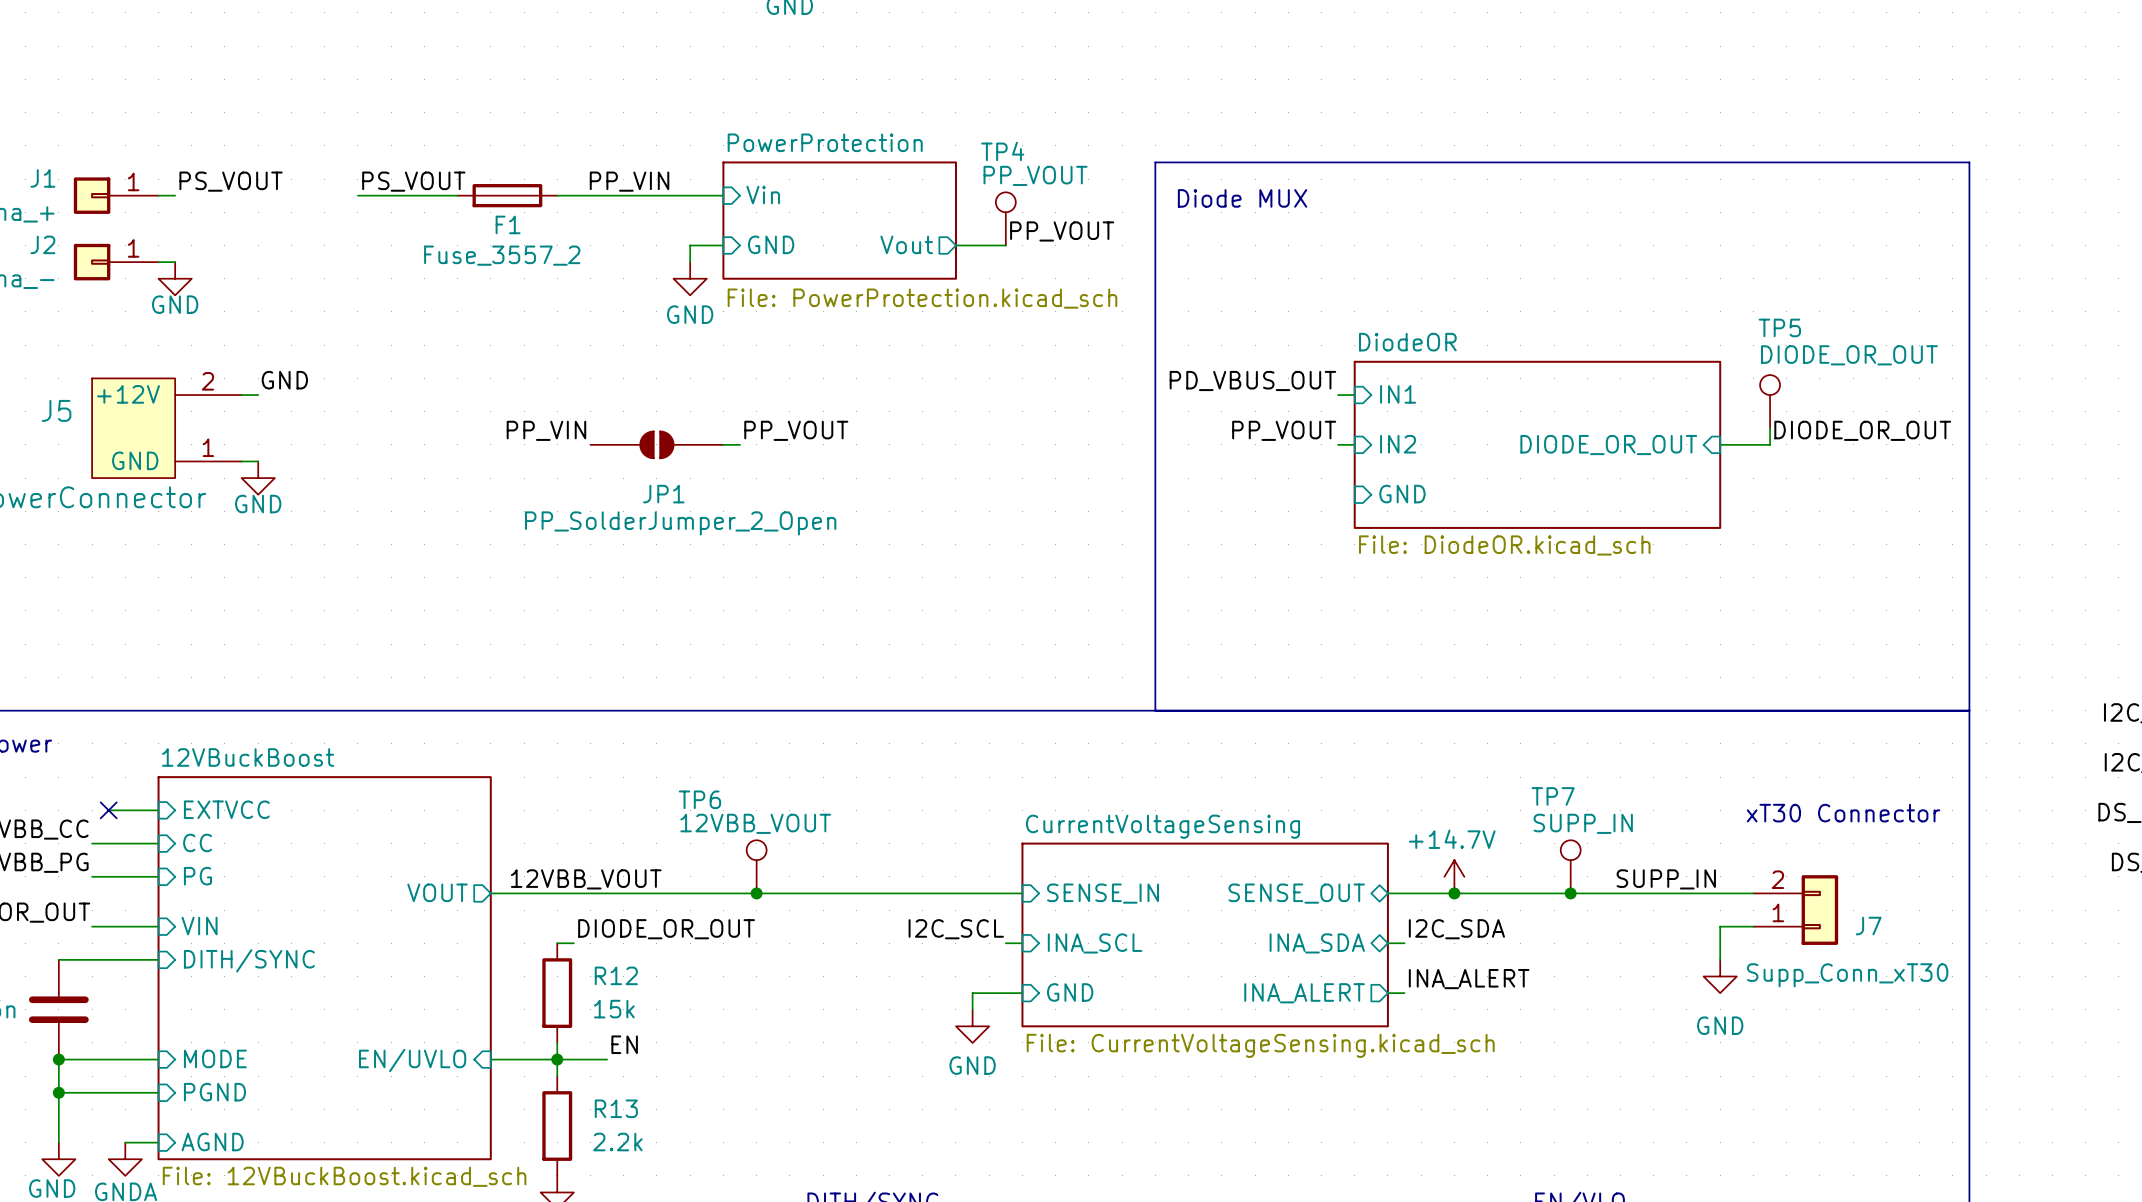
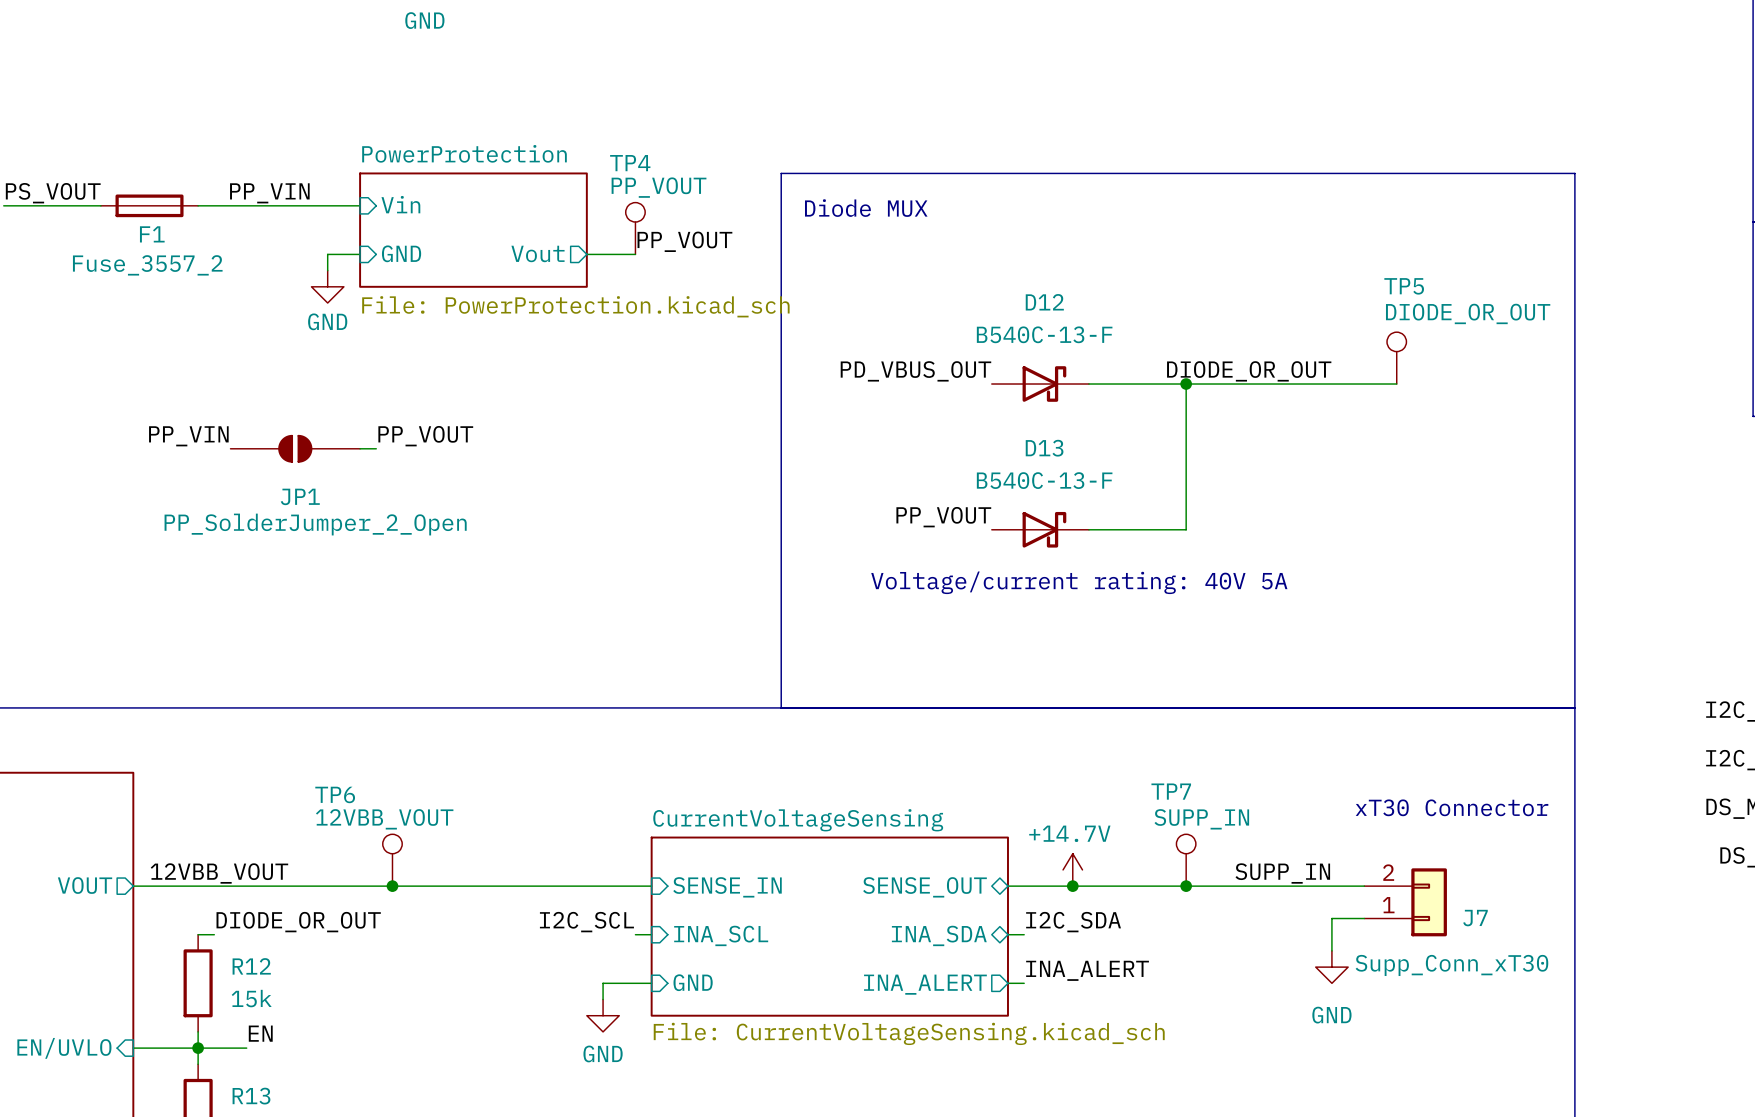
D12: none -> B540C-13-F (1040, 384)
wire: none -> (1088, 384) (1396, 384)
wire: none -> (1186, 384) (1186, 529) (1088, 529)
junction: none -> (1186, 384)
label position: PD_VBUS_OUT (1252, 380) -> PD_VBUS_OUT (915, 371)
sheet pin: IN1 (1398, 394) -> none
wire: (1338, 395) (1354, 395) -> none
TP5 position: (1770, 401) -> (1396, 358)
wire: (1770, 428) (1770, 444) (1720, 444) -> none
label position: PP_VOUT (1284, 430) -> PP_VOUT (943, 517)
label position: DIODE_OR_OUT (1862, 430) -> DIODE_OR_OUT (1249, 371)
wire: (1338, 444) (1354, 444) -> none
sheet pin: IN2 (1398, 444) -> none
sheet DiodeOR: File: DiodeOR.kicad_sch (1537, 444) -> none
sheet pin: DIODE_OR_OUT (1608, 445) -> none
sheet pin: GND (1402, 494) -> none
D13: none -> B540C-13-F (1040, 529)
text: none -> Voltage/current rating: 40V 5A (1079, 582)

